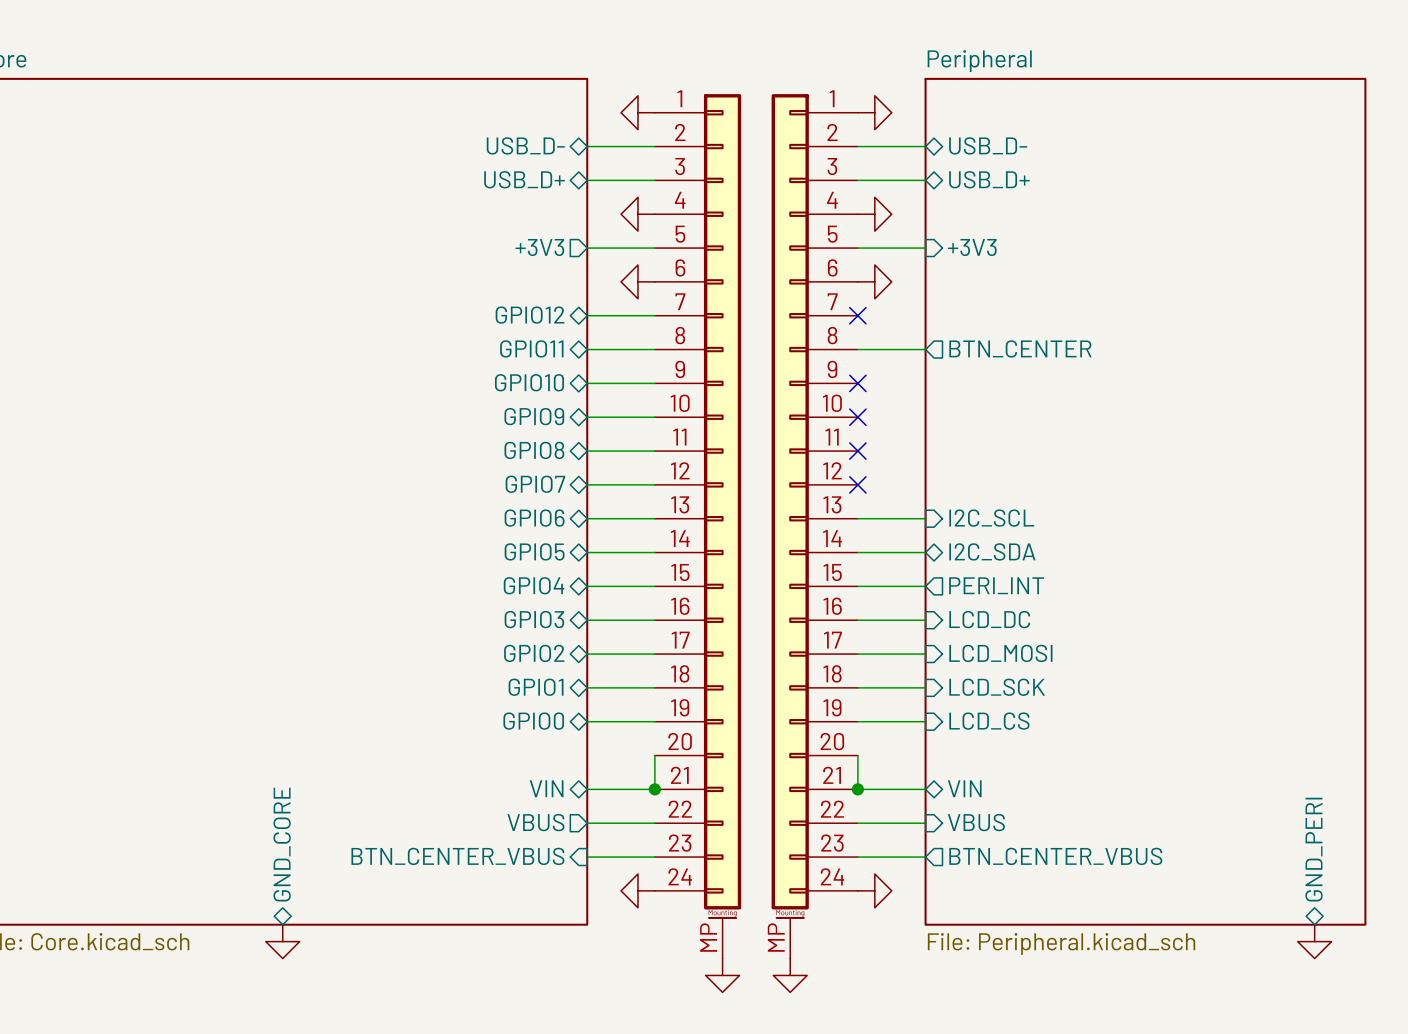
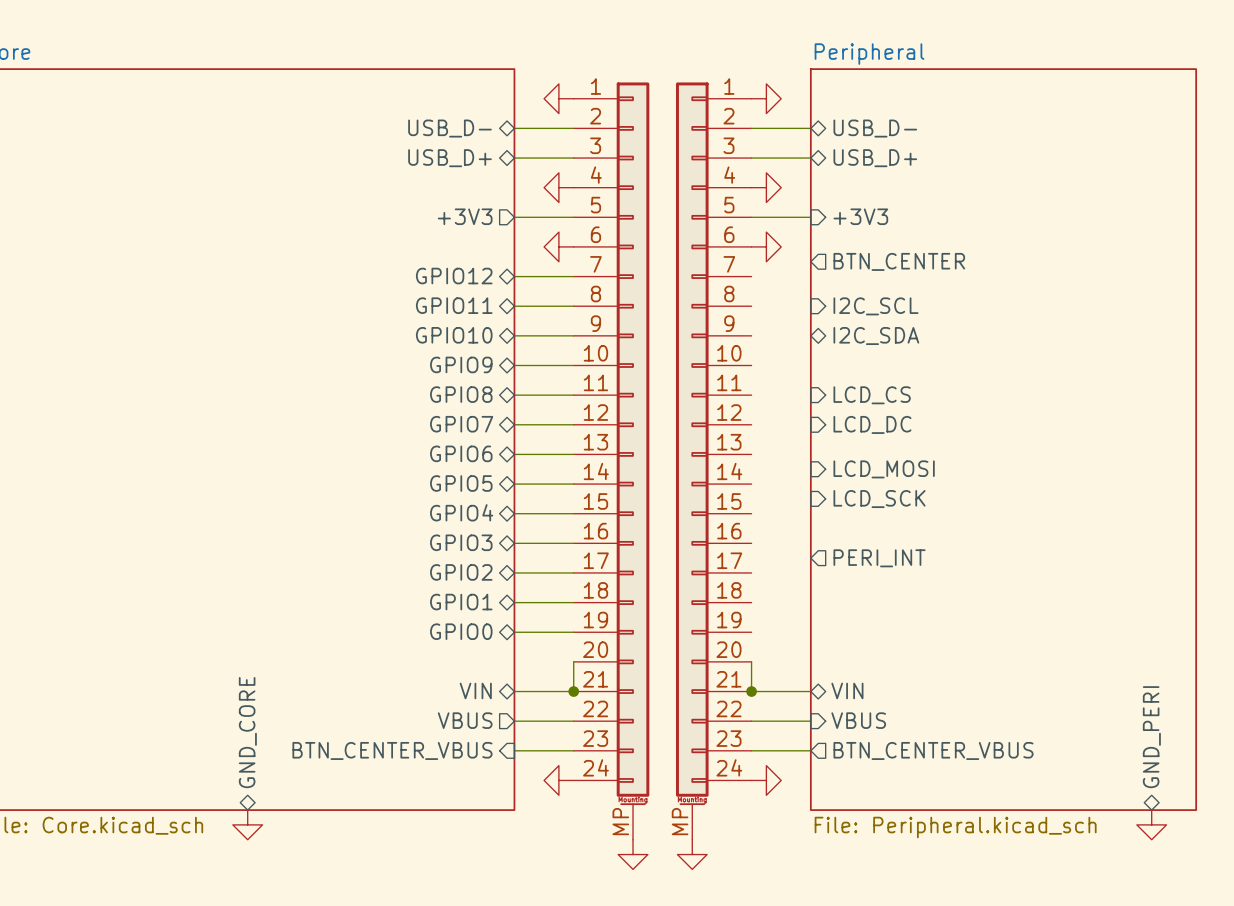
sheet pin: none -> BTN_CENTER (899, 261)
no-connect mark: (857, 315) -> none
sheet pin shape: output (1020, 348) -> input (876, 306)
sheet pin: BTN_CENTER (1020, 348) -> I2C_SCL (876, 306)
wire: (857, 349) (925, 349) -> none
no-connect mark: (857, 383) -> none
no-connect mark: (857, 417) -> none
no-connect mark: (857, 451) -> none
no-connect mark: (857, 484) -> none
wire: (857, 518) (925, 518) -> none
sheet pin: I2C_SCL (991, 518) -> none
sheet pin position: I2C_SDA (992, 551) -> I2C_SDA (876, 336)
wire: (857, 552) (925, 552) -> none
sheet pin position: PERI_INT (996, 585) -> PERI_INT (879, 558)
wire: (857, 586) (925, 586) -> none
sheet pin position: LCD_DC (989, 619) -> LCD_DC (872, 424)
wire: (857, 620) (925, 620) -> none
sheet pin position: LCD_MOSI (1000, 653) -> LCD_MOSI (884, 469)
wire: (857, 654) (925, 654) -> none
wire: (857, 687) (925, 687) -> none
sheet pin position: LCD_SCK (997, 687) -> LCD_SCK (879, 499)
wire: (857, 721) (925, 721) -> none
sheet pin position: LCD_CS (989, 721) -> LCD_CS (872, 395)

